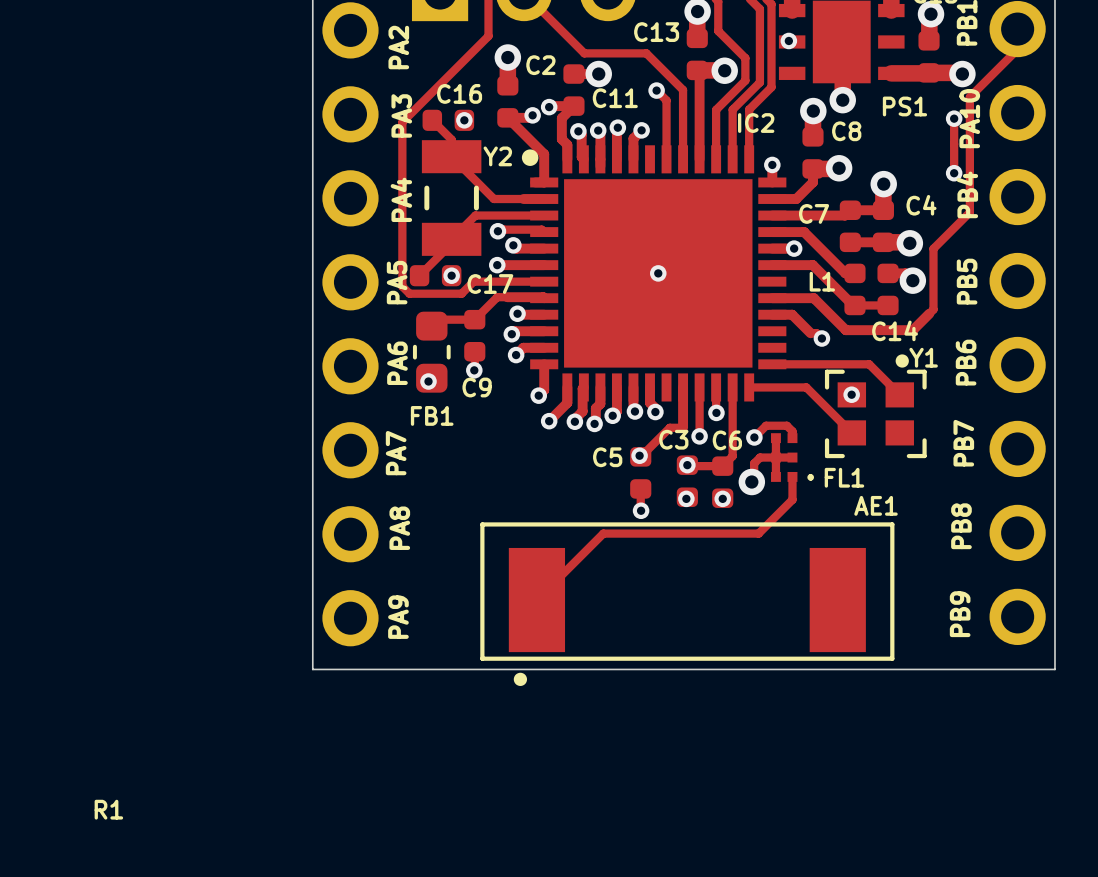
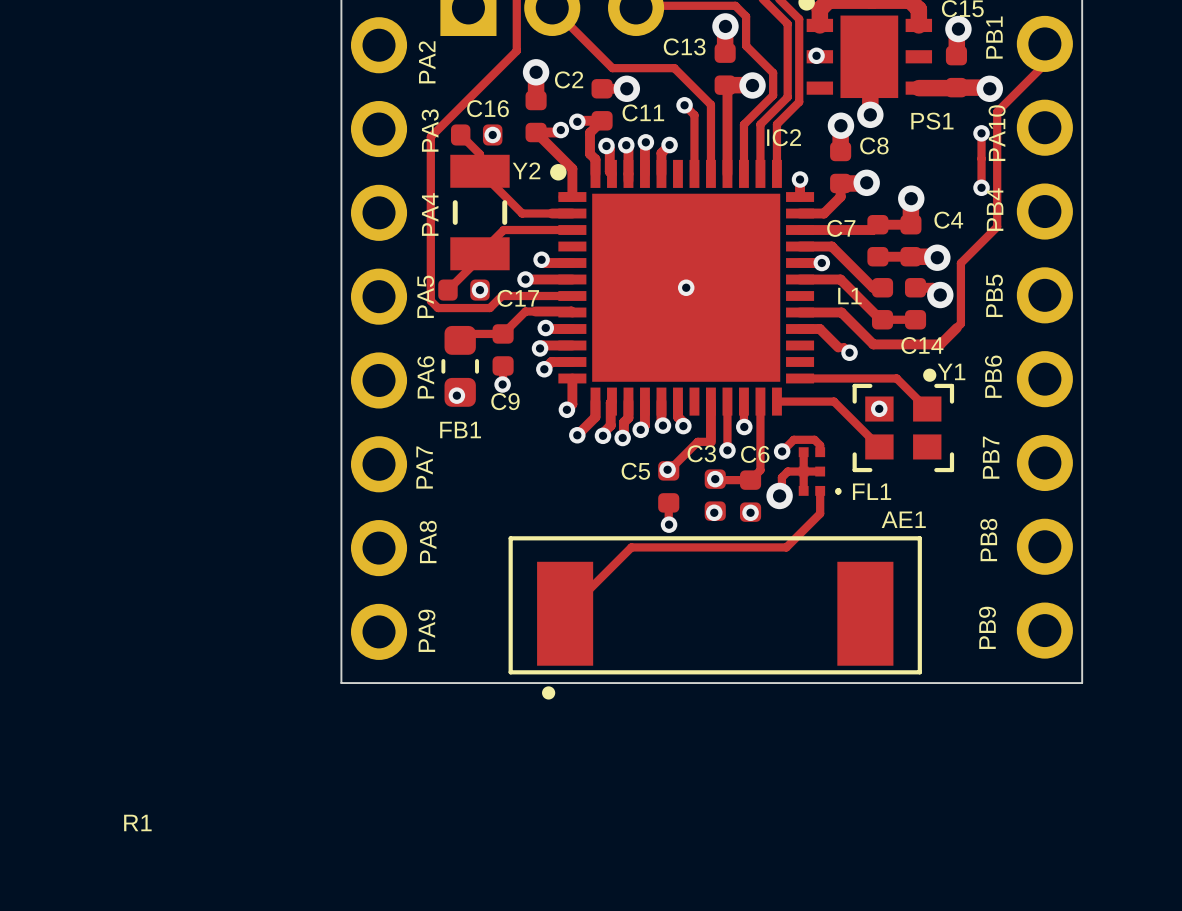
track: (497, 231) (541, 229) (544, 232) -> none
via: (497, 231) -> none

